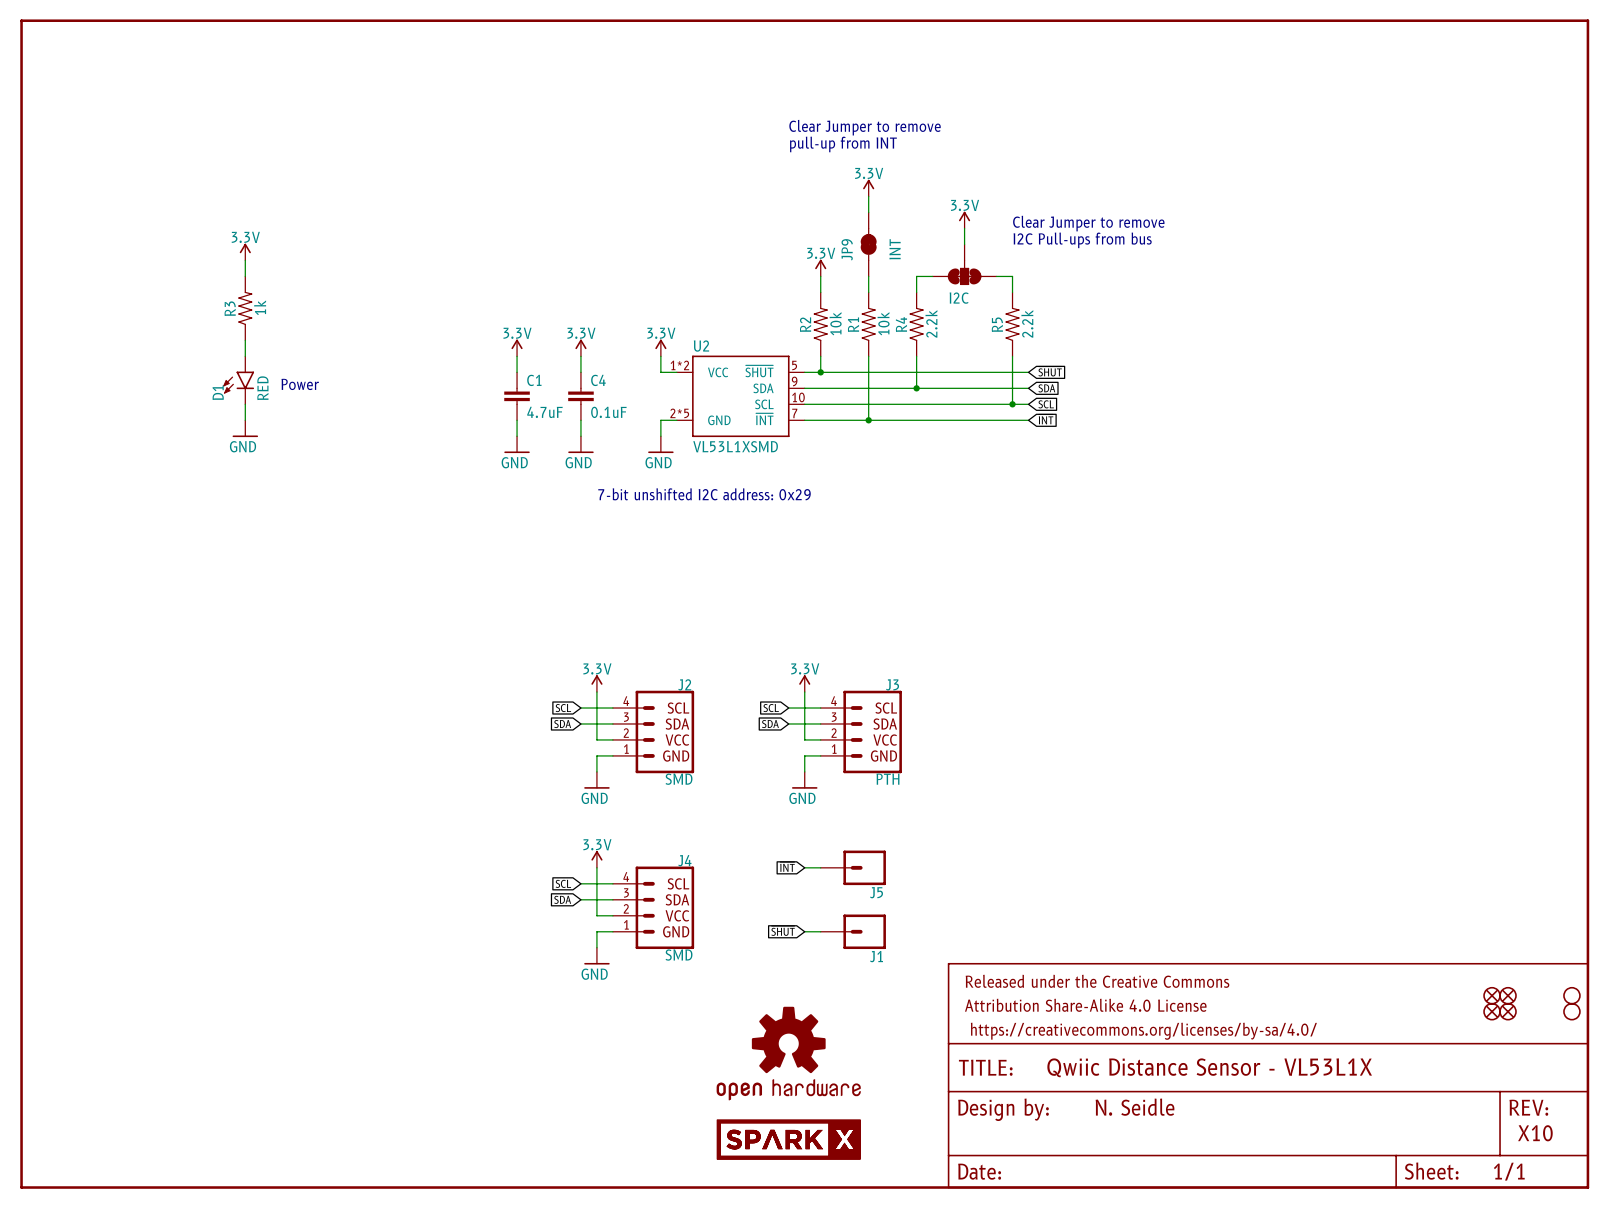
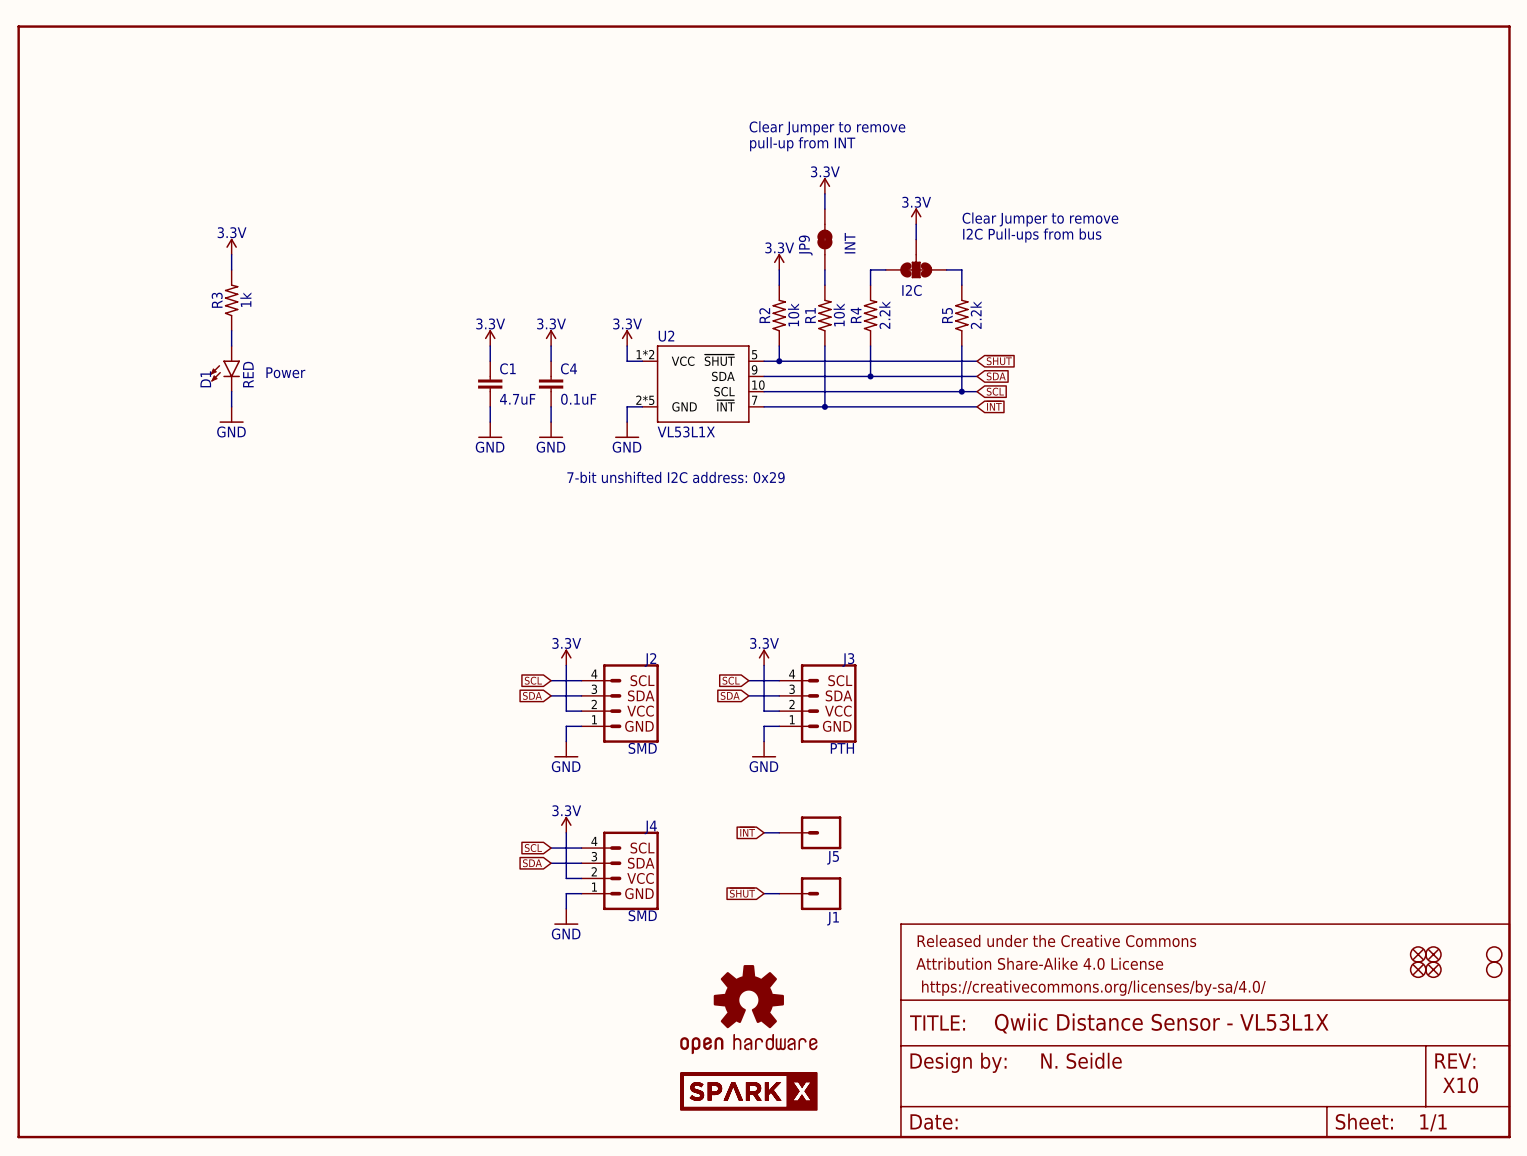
U2 value: VL53L1XSMD (735, 446) -> VL53L1X (686, 431)

